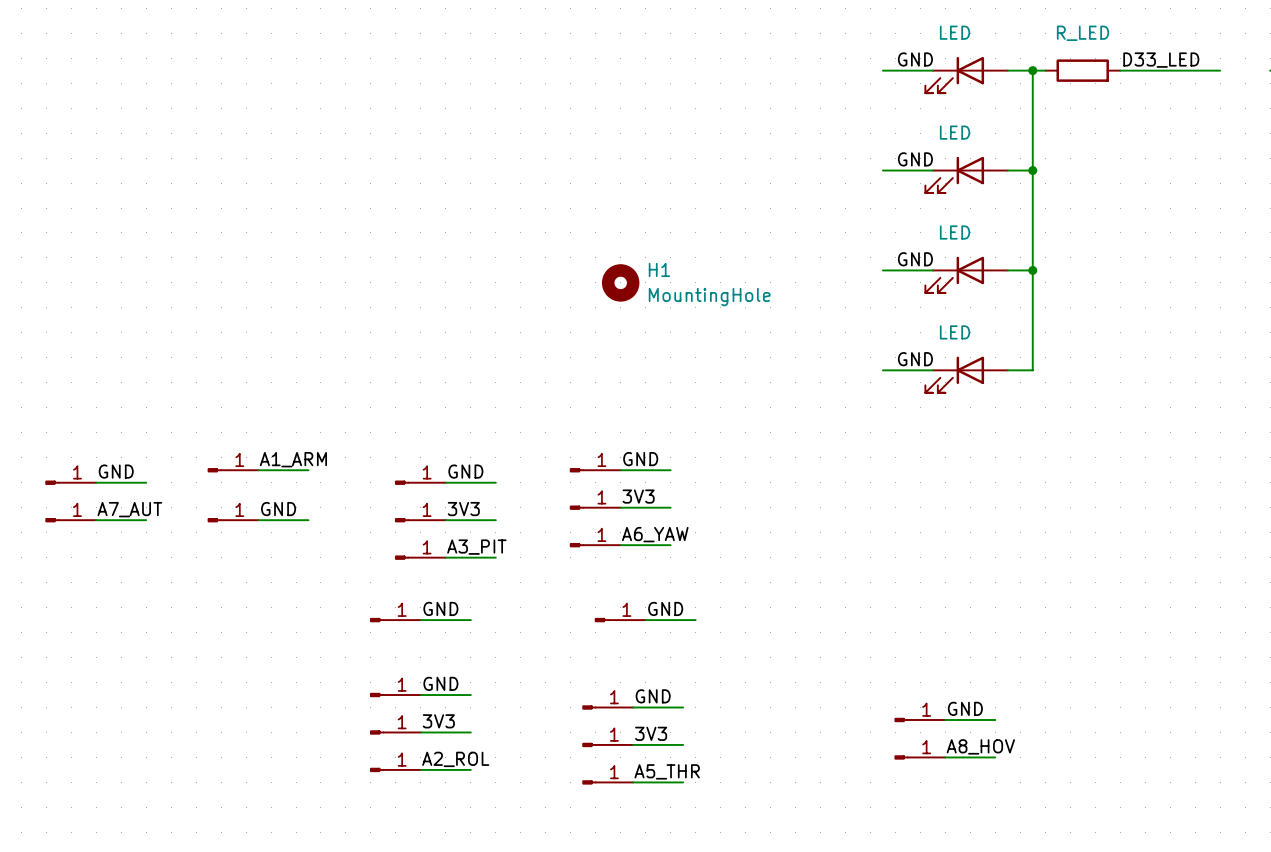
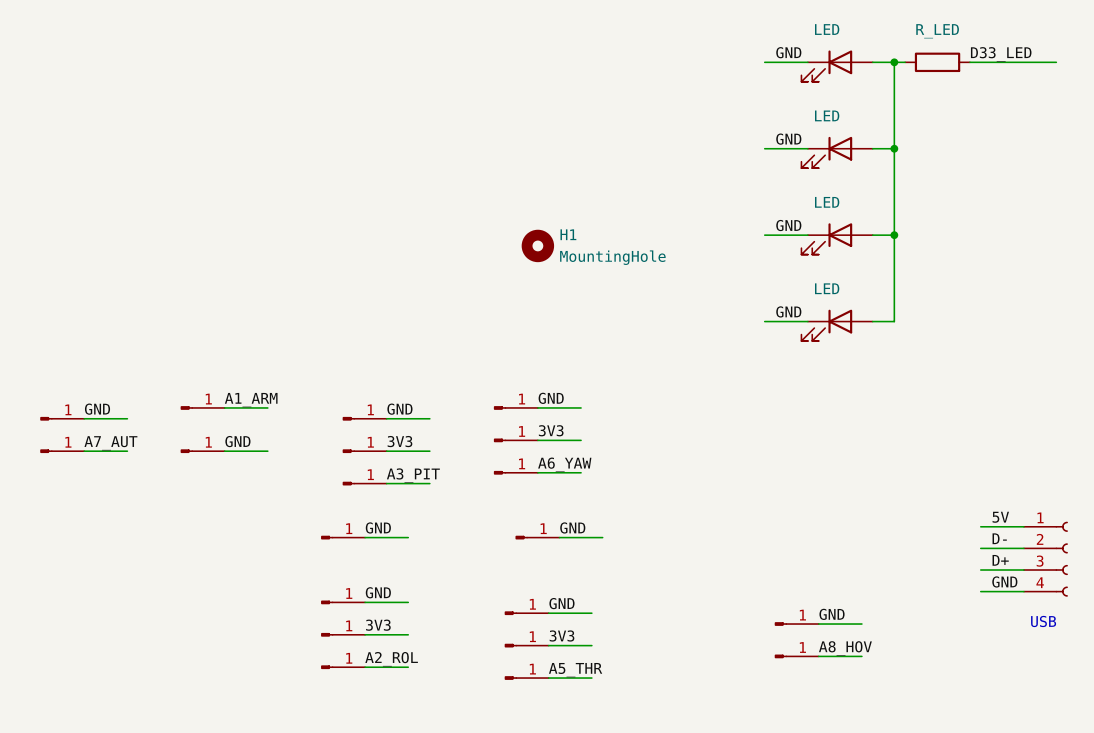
label: none -> 5V (1000, 517)
wire: none -> (980, 526) (1023, 526)
label: none -> D- (999, 538)
wire: none -> (980, 548) (1023, 548)
part: none -> (1045, 559)
label: none -> D+ (1000, 560)
wire: none -> (980, 570) (1023, 570)
label: none -> GND (1004, 581)
wire: none -> (980, 591) (1023, 591)
text: none -> USB (1043, 621)

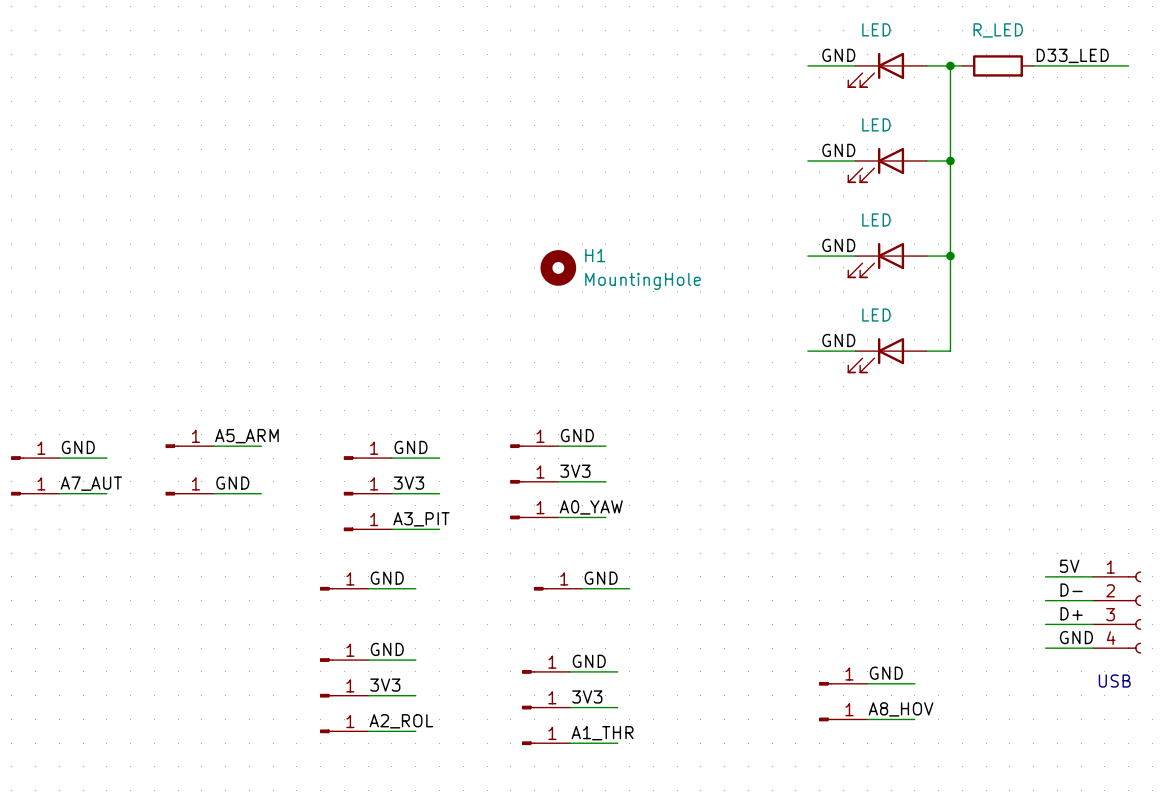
label: A1_ARM (251, 400) -> A5_ARM (246, 436)
label: A6_YAW (564, 464) -> A0_YAW (591, 507)
label: A5_THR (575, 670) -> A1_THR (602, 733)

